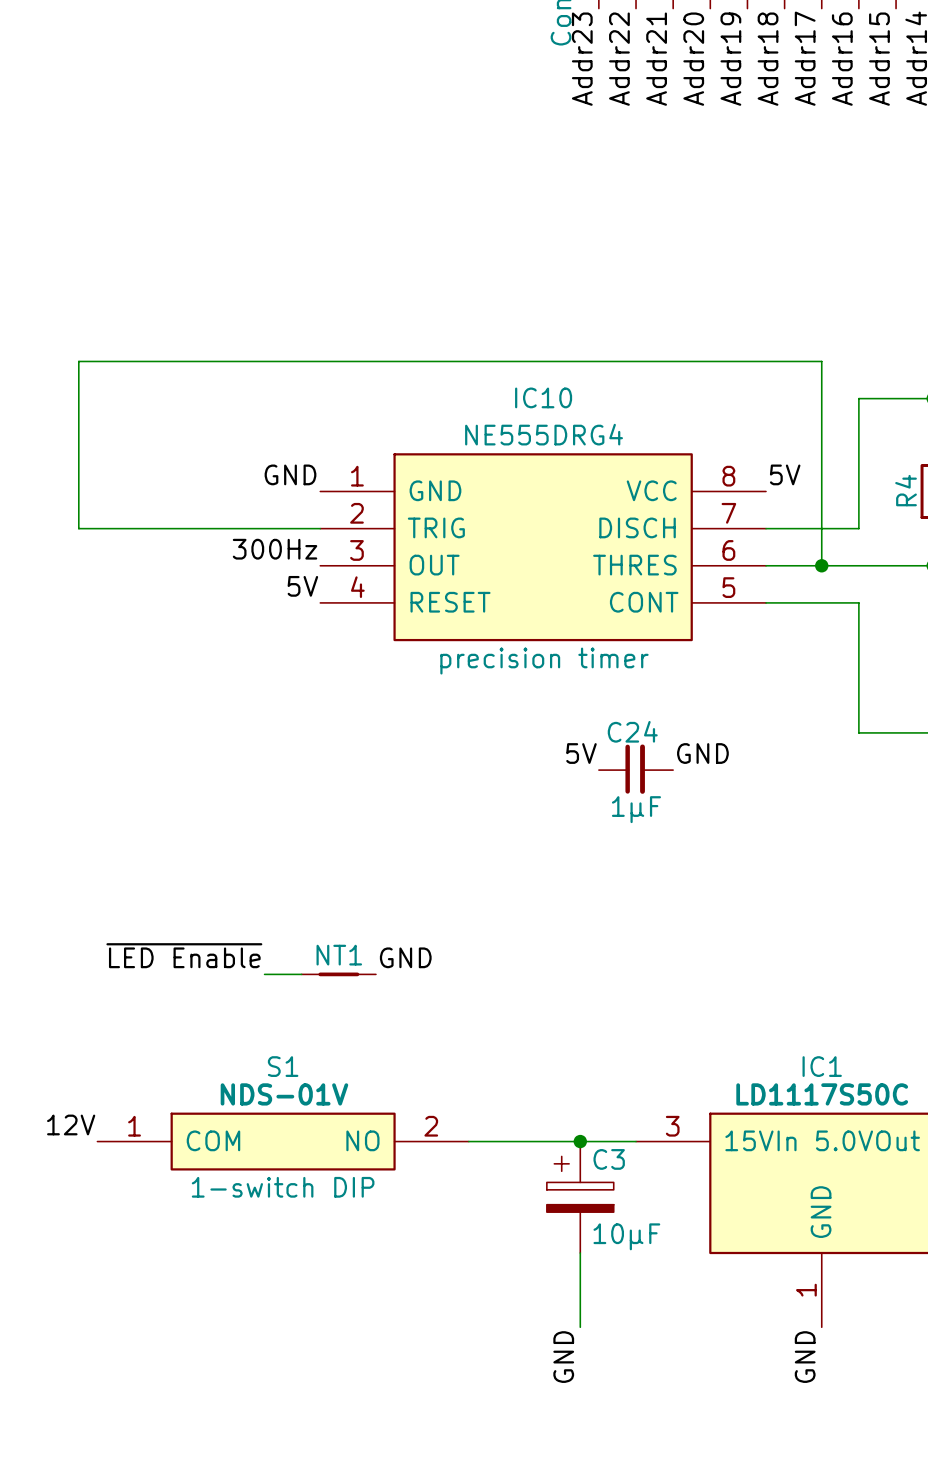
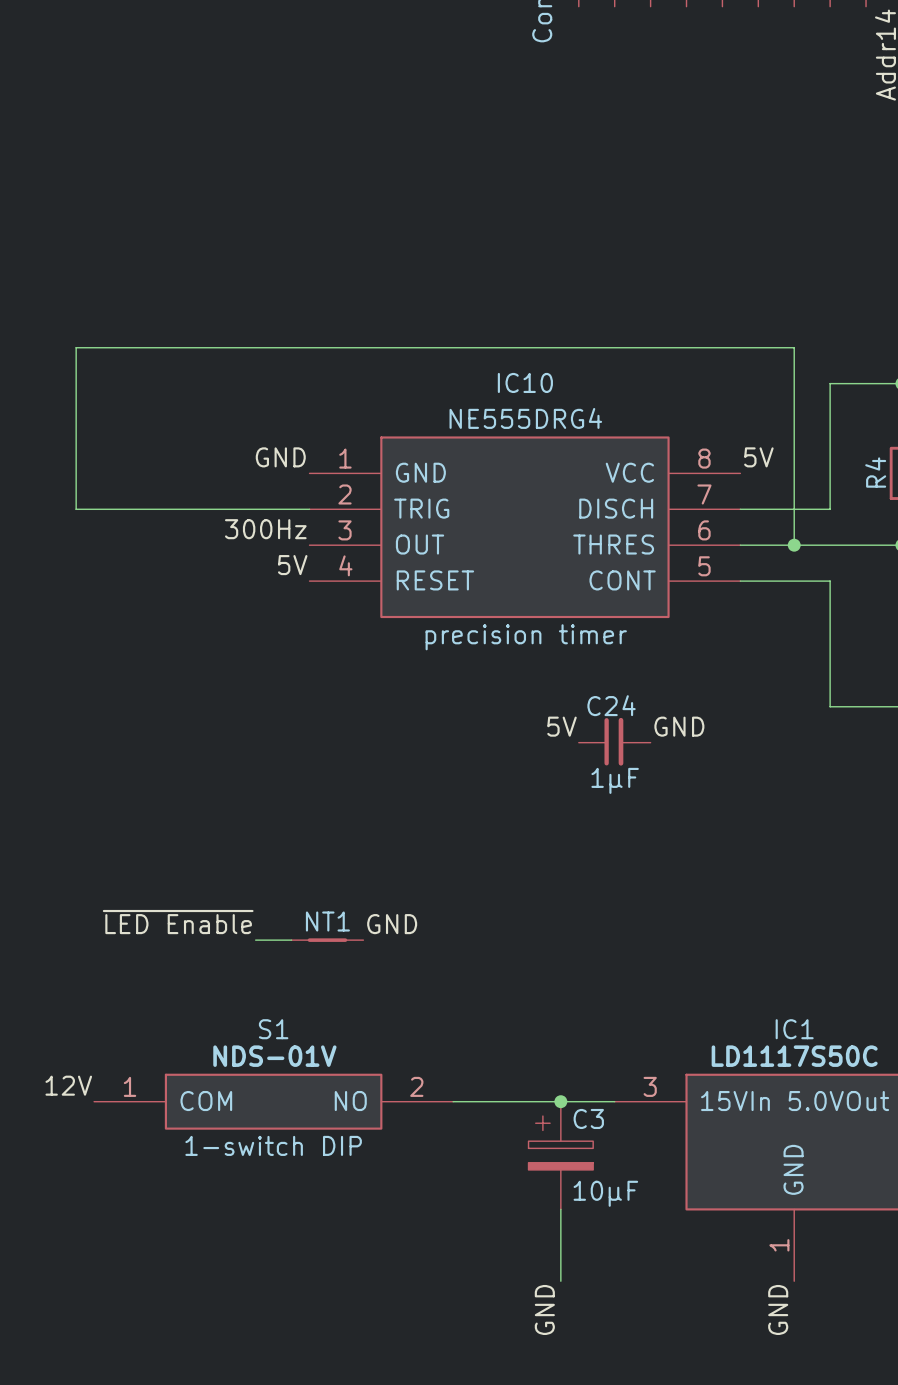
label: Addr17 (805, 58) -> none
label: Addr23 (582, 59) -> none
label: Addr22 (619, 59) -> none
label: Addr21 (656, 59) -> none
label: Addr20 (693, 59) -> none
label: Addr19 (730, 59) -> none
label: Addr18 (768, 59) -> none
label: Addr16 (842, 59) -> none
label: Addr15 (879, 59) -> none

